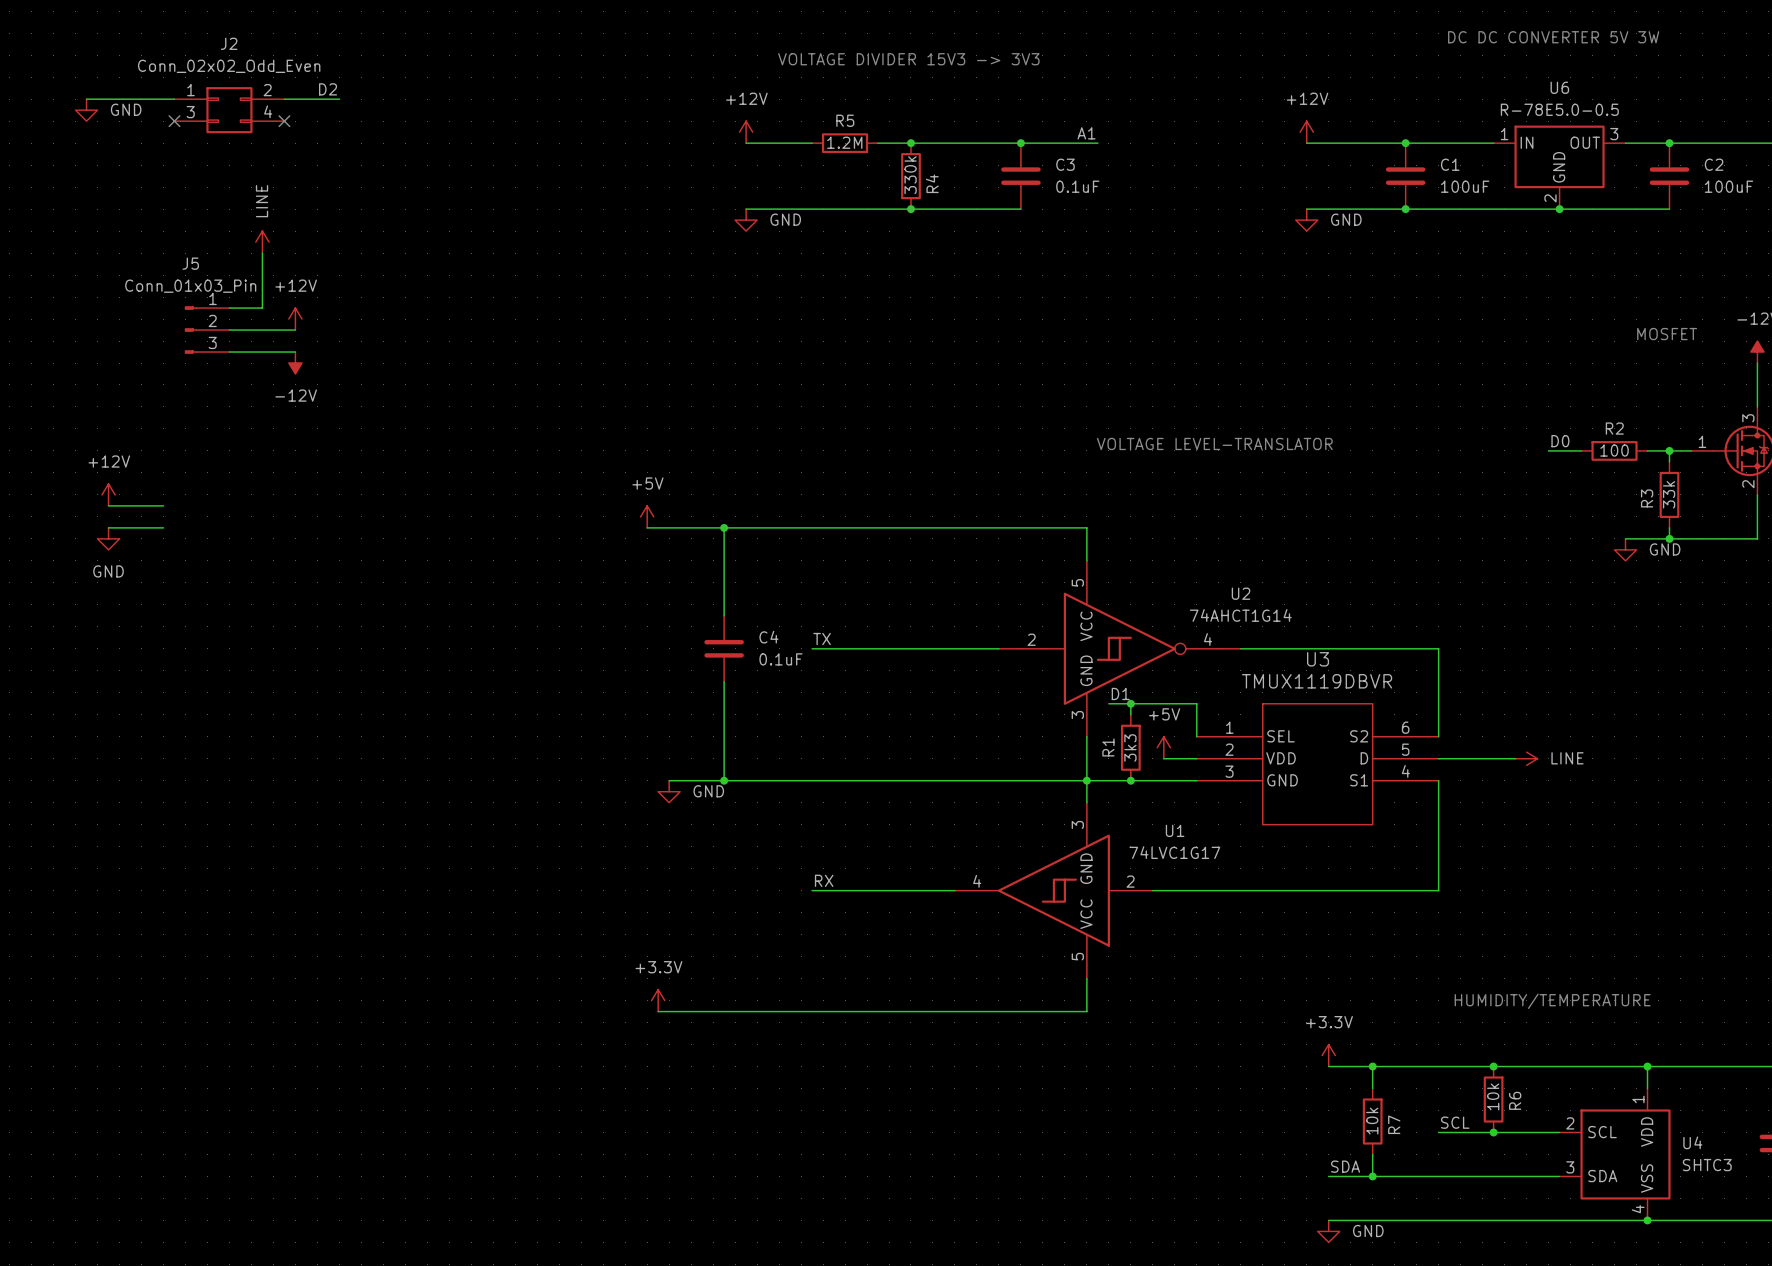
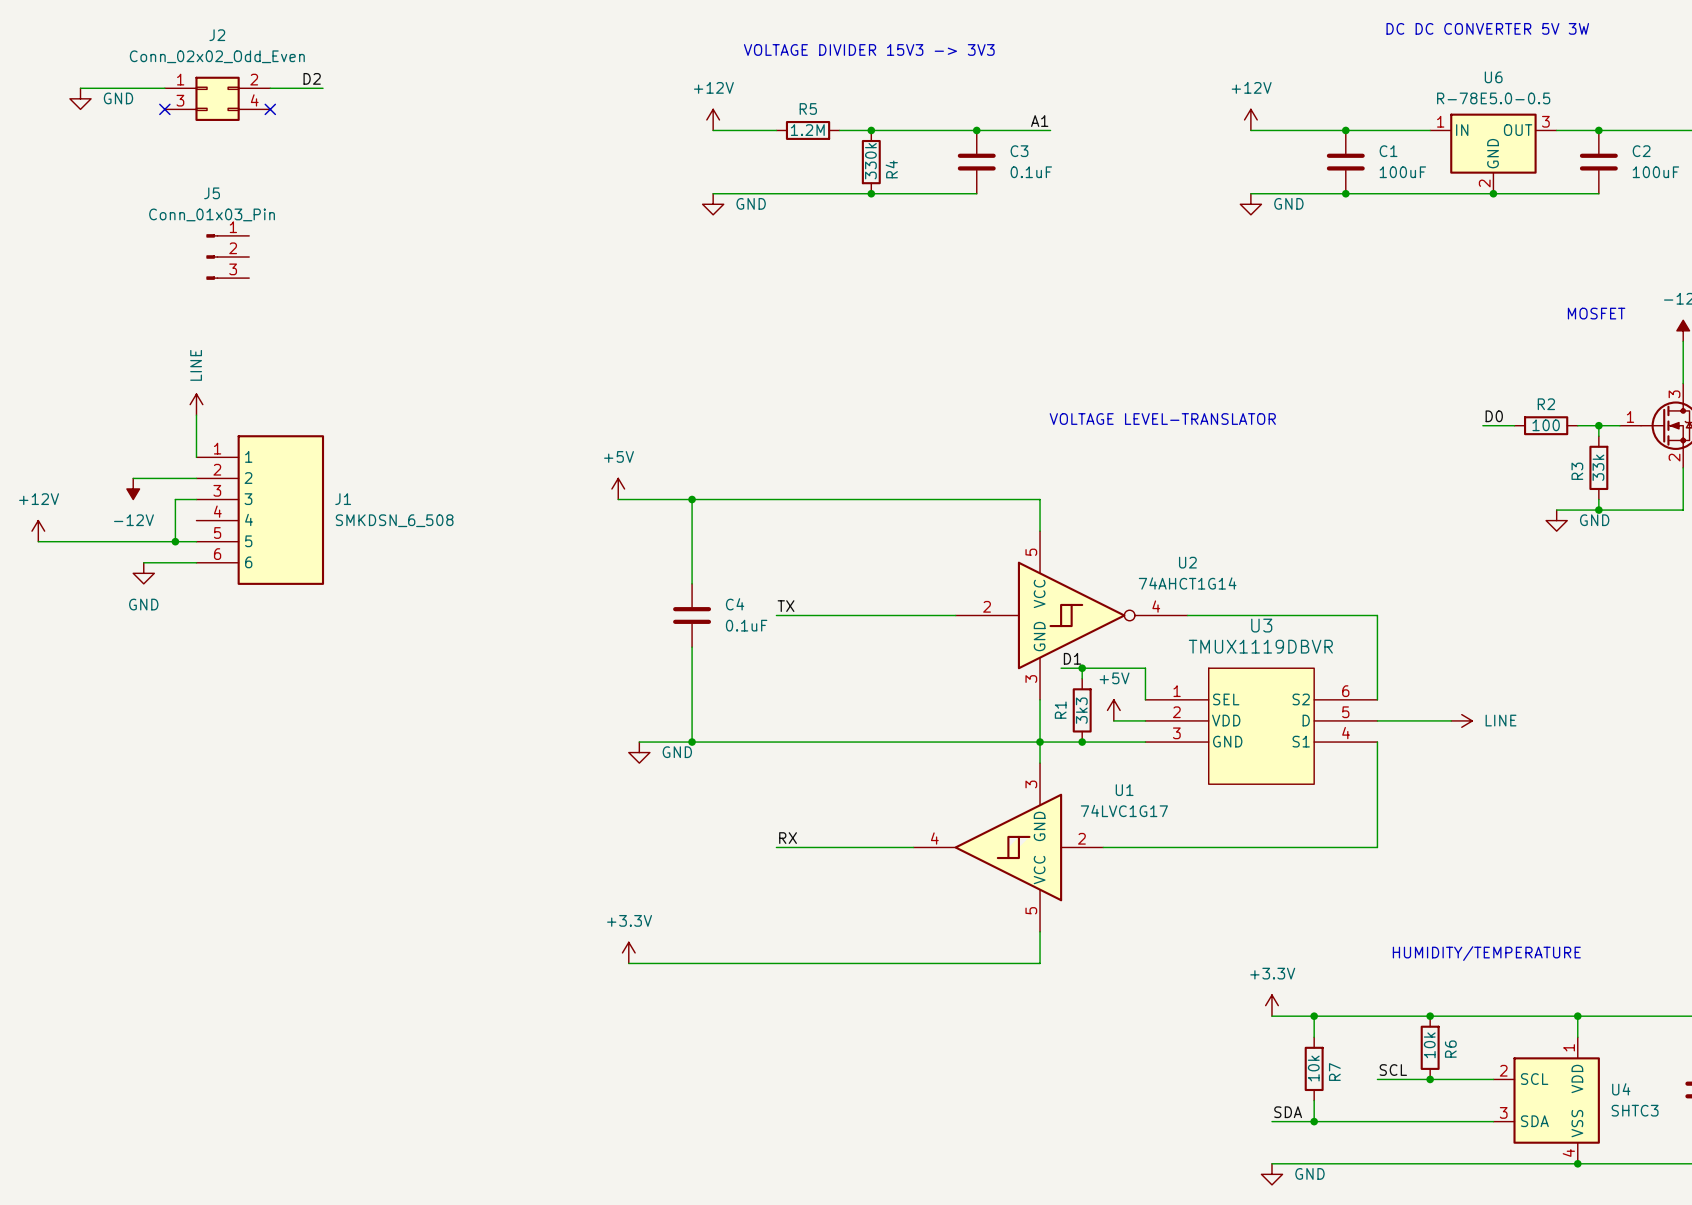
power symbol position: LINE (262, 242) -> LINE (196, 404)
wire: (262, 253) (262, 308) (229, 308) -> none
power symbol: +12V (295, 319) -> none
J5 position: (207, 330) -> (227, 257)
wire: (229, 330) (295, 330) -> none
wire: (229, 352) (295, 352) -> none
power symbol: -12V (295, 363) -> none
wire: none -> (196, 415) (196, 457)
power symbol position: +12V (108, 494) -> +12V (38, 531)
wire: (108, 505) (141, 505) -> none
wire: none -> (154, 478) (196, 478)
power symbol: none -> -12V (133, 488)
wire: (108, 527) (163, 527) -> (143, 562) (196, 562)
wire: none -> (196, 499) (175, 499) (175, 541)
power symbol position: GND (108, 538) -> GND (143, 573)
J1: none -> SMKDSN_6_508 (260, 510)
wire: none -> (38, 541) (196, 541)
junction: none -> (175, 541)

